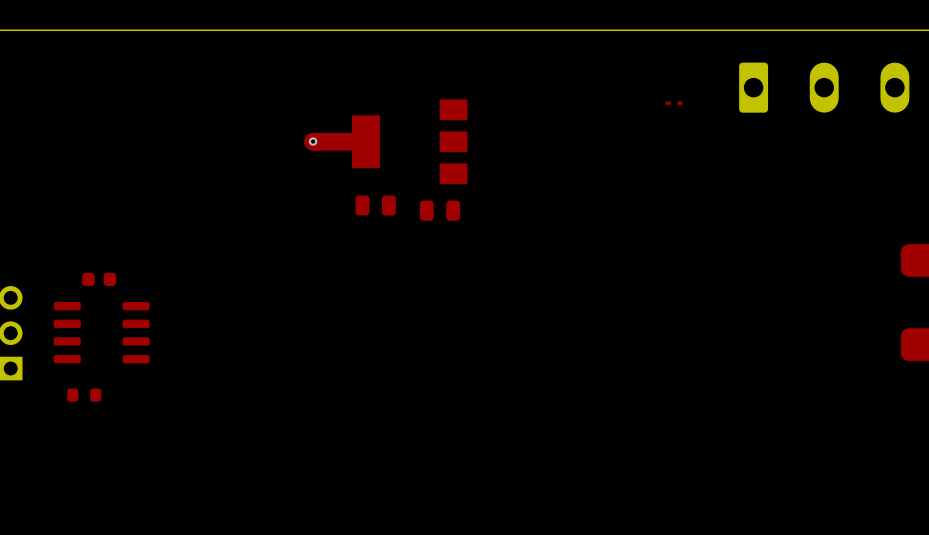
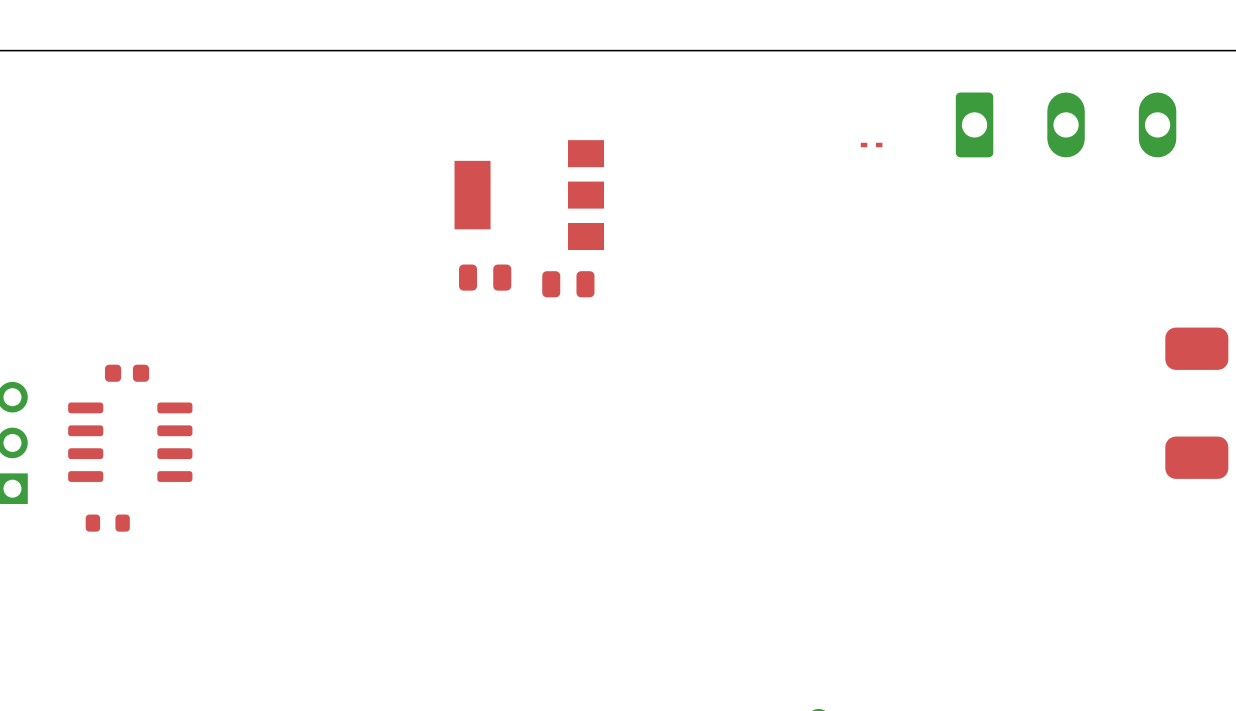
top track: (313, 141) (365, 141) -> none
via: (313, 141) -> none

